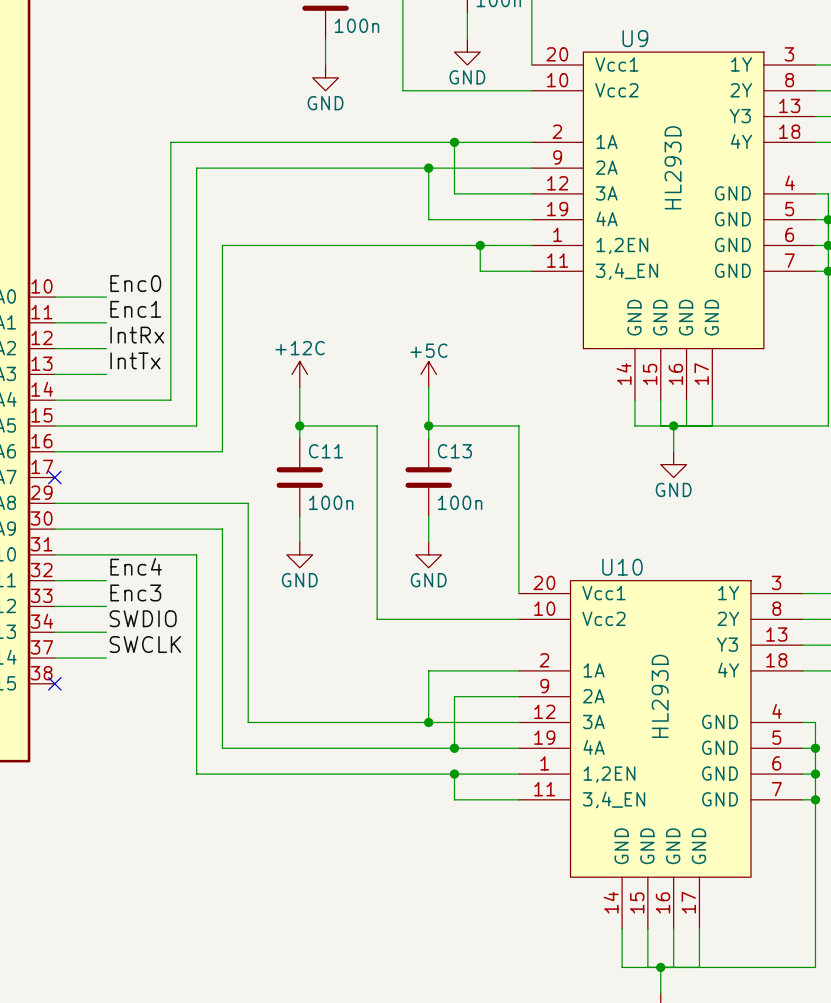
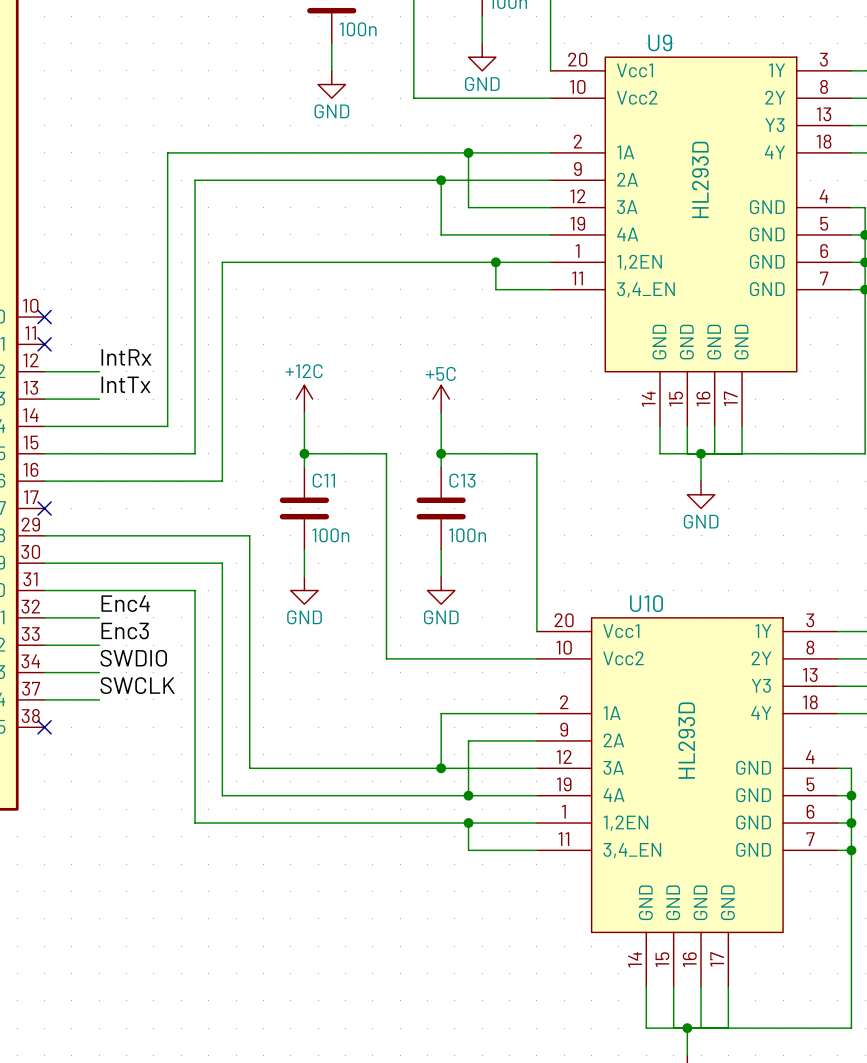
label: Enc0 (135, 283) -> none
wire: (54, 297) (106, 297) -> none
no-connect mark: none -> (44, 317)
label: Enc1 (135, 309) -> none
wire: (54, 322) (106, 322) -> none
no-connect mark: none -> (44, 344)

